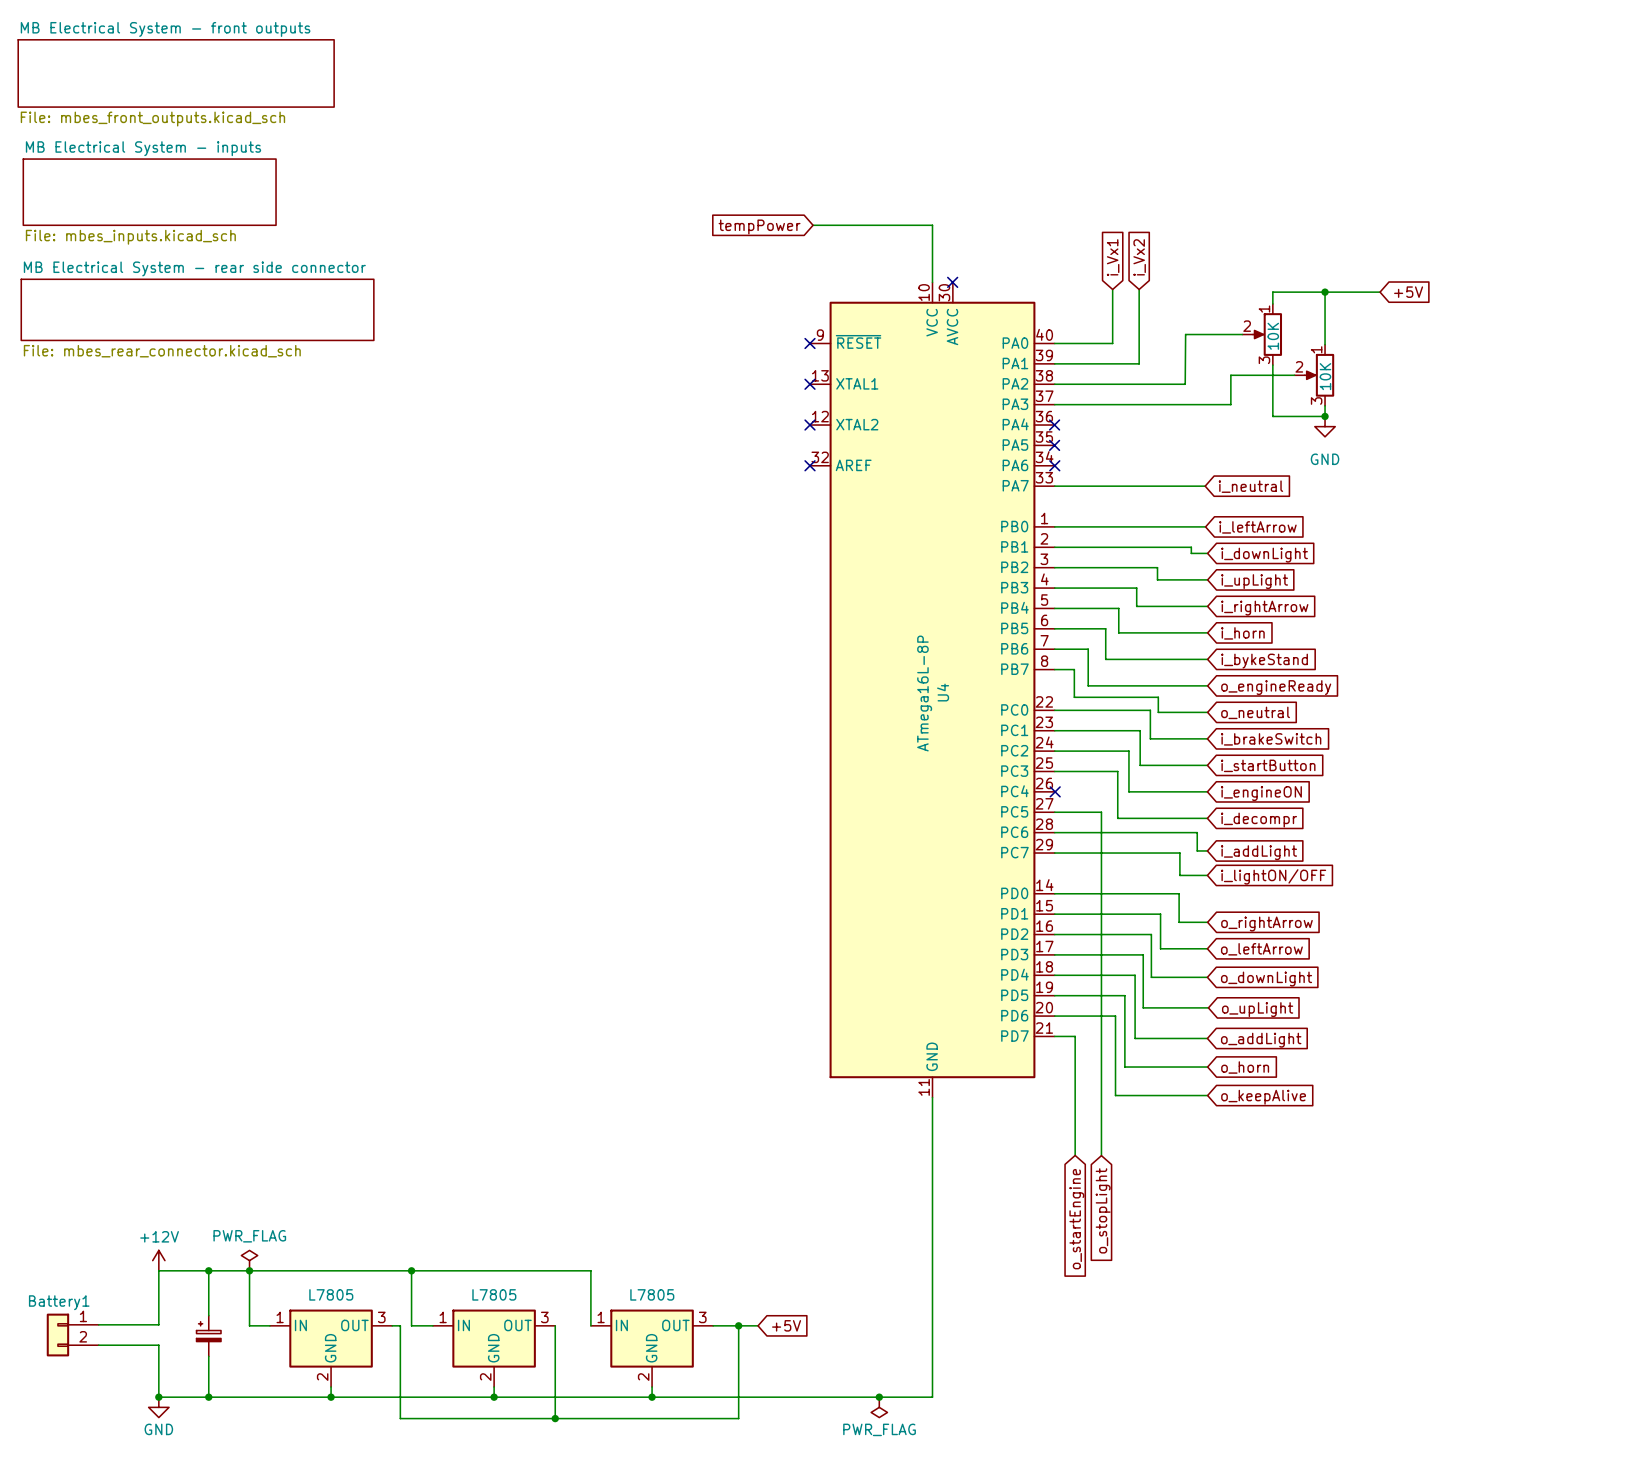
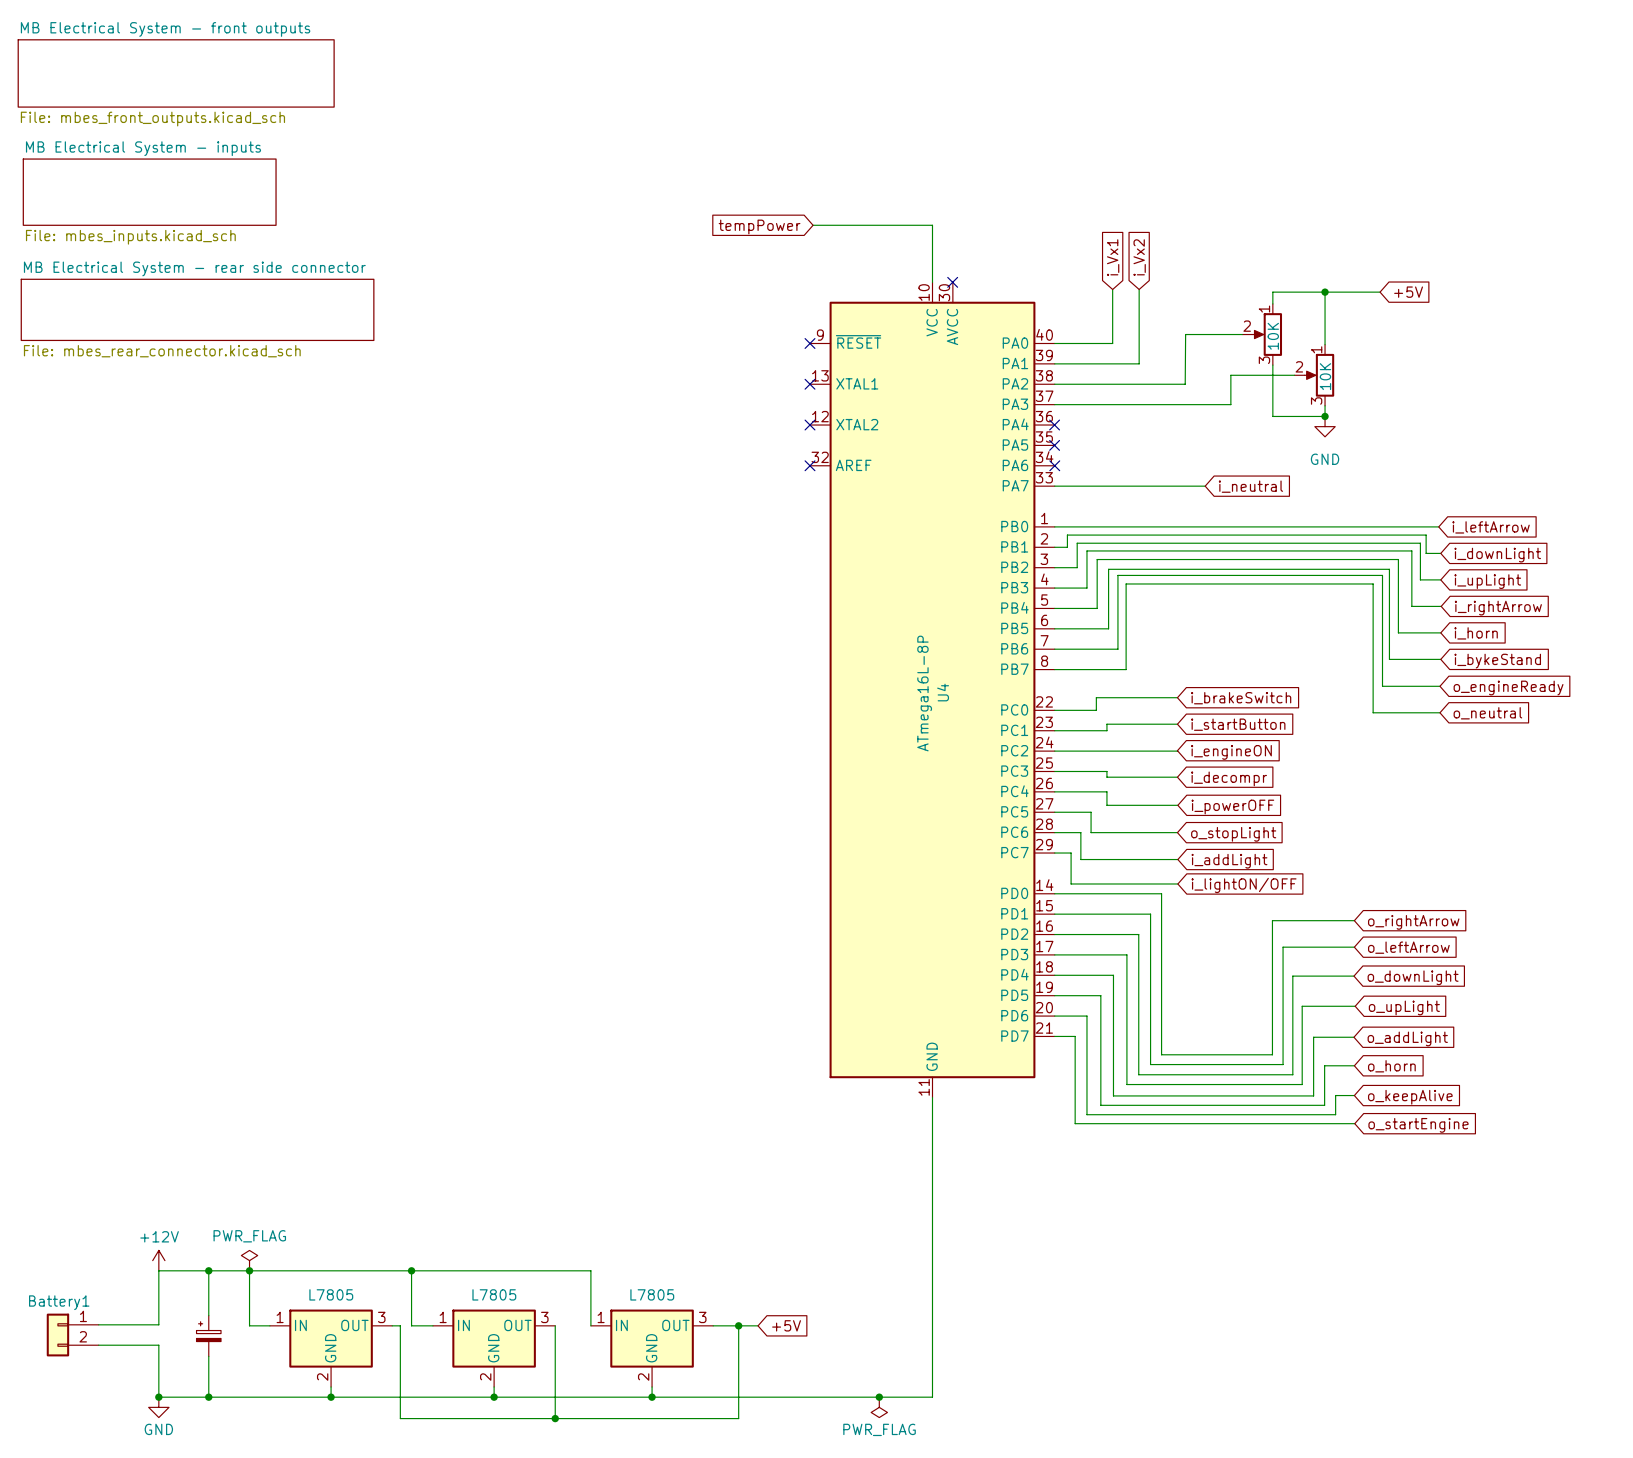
wire: none -> (1205, 526) (1438, 526)
global label: i_leftArrow (1257, 527) -> none
global label: none -> i_leftArrow (1491, 527)
wire: (1067, 547) (1191, 547) (1191, 553) (1207, 553) -> (1067, 547) (1067, 535) (1426, 535) (1426, 553) (1440, 553)
global label: i_downLight (1264, 555) -> none
global label: none -> i_downLight (1497, 555)
wire: (1077, 567) (1157, 567) (1157, 579) (1207, 579) -> (1077, 567) (1077, 543) (1420, 543) (1420, 579) (1440, 579)
global label: i_upLight (1254, 581) -> none
global label: none -> i_upLight (1487, 581)
wire: (1086, 588) (1136, 588) (1136, 606) (1207, 606) -> (1086, 588) (1086, 550) (1411, 550) (1411, 606) (1441, 606)
wire: (1097, 608) (1118, 608) (1118, 632) (1207, 632) -> (1097, 608) (1097, 559) (1398, 559) (1398, 632) (1440, 632)
global label: i_rightArrow (1264, 608) -> none
global label: none -> i_rightArrow (1498, 608)
wire: (1105, 628) (1105, 659) (1207, 659) -> (1105, 628) (1108, 628) (1108, 569) (1389, 569) (1389, 659) (1440, 659)
global label: i_horn (1242, 633) -> none
global label: none -> i_horn (1476, 633)
wire: (1088, 649) (1088, 685) (1207, 685) -> (1088, 649) (1117, 649) (1117, 575) (1382, 575) (1382, 686) (1439, 686)
global label: i_bykeStand (1264, 661) -> none
global label: none -> i_bykeStand (1497, 661)
wire: (1074, 669) (1074, 697) (1158, 697) (1158, 712) (1207, 712) -> (1074, 669) (1126, 669) (1126, 583) (1373, 583) (1373, 712) (1439, 712)
global label: o_engineReady (1276, 687) -> none
global label: none -> o_engineReady (1508, 687)
wire: (1096, 710) (1150, 710) (1150, 738) (1207, 738) -> (1096, 710) (1096, 697) (1177, 697)
global label: o_neutral (1255, 712) -> none
global label: none -> o_neutral (1487, 713)
wire: (1106, 730) (1140, 730) (1140, 765) (1207, 765) -> (1106, 730) (1106, 724) (1177, 724)
global label position: i_brakeSwitch (1271, 739) -> i_brakeSwitch (1241, 698)
wire: (1128, 751) (1128, 791) (1207, 791) -> (1128, 751) (1177, 750)
global label position: i_startButton (1268, 765) -> i_startButton (1238, 724)
wire: (1106, 771) (1117, 771) (1117, 818) (1207, 818) -> (1106, 771) (1106, 777) (1177, 777)
wire: none -> (1054, 791) (1106, 791) (1106, 805) (1177, 805)
no-connect mark: (1055, 791) -> none
global label position: i_engineON (1261, 793) -> i_engineON (1231, 752)
global label: none -> i_powerOFF (1232, 807)
wire: (1091, 812) (1101, 812) (1101, 1155) -> none
global label position: i_decompr (1259, 820) -> i_decompr (1229, 778)
wire: (1080, 832) (1091, 832) -> (1091, 812) (1091, 832)
wire: none -> (1080, 832) (1080, 859) (1177, 859)
wire: (1177, 832) (1197, 832) (1197, 850) (1207, 850) -> none
global label: none -> o_stopLight (1233, 834)
global label position: i_addLight (1259, 852) -> i_addLight (1229, 861)
wire: (1071, 853) (1179, 853) (1179, 875) (1207, 875) -> (1071, 853) (1071, 883) (1177, 883)
global label position: i_lightON/OFF (1273, 876) -> i_lightON/OFF (1244, 885)
wire: (1161, 893) (1179, 893) (1179, 922) (1207, 922) -> (1161, 893) (1161, 1054) (1272, 1054) (1272, 920) (1354, 920)
wire: (1150, 914) (1160, 914) (1160, 948) (1207, 948) -> (1150, 914) (1150, 1064) (1283, 1064) (1283, 947) (1354, 947)
global label position: o_rightArrow (1266, 924) -> o_rightArrow (1413, 922)
wire: (1138, 934) (1151, 934) (1151, 977) (1207, 977) -> (1138, 934) (1138, 1074) (1292, 1074) (1292, 976) (1353, 976)
global label position: o_leftArrow (1261, 949) -> o_leftArrow (1408, 947)
wire: (1126, 954) (1143, 954) (1143, 1007) (1208, 1007) -> (1126, 954) (1126, 1084) (1302, 1084) (1302, 1006) (1355, 1006)
wire: (1113, 975) (1135, 975) (1135, 1038) (1207, 1038) -> (1113, 975) (1113, 1095) (1313, 1095) (1313, 1037) (1353, 1037)
global label position: o_downLight (1266, 979) -> o_downLight (1413, 977)
wire: (1100, 995) (1124, 995) (1124, 1067) (1207, 1067) -> (1100, 995) (1100, 1105) (1324, 1105) (1324, 1065) (1354, 1065)
global label position: o_upLight (1257, 1009) -> o_upLight (1404, 1007)
wire: (1086, 1016) (1115, 1016) (1115, 1095) (1207, 1095) -> (1086, 1016) (1086, 1114) (1335, 1114) (1335, 1095) (1354, 1095)
global label position: o_addLight (1261, 1040) -> o_addLight (1407, 1038)
global label position: o_horn (1245, 1067) -> o_horn (1391, 1066)
global label position: o_keepAlive (1263, 1097) -> o_keepAlive (1410, 1097)
wire: (1075, 1123) (1075, 1155) -> (1075, 1123) (1354, 1123)
global label: none -> o_startEngine (1418, 1125)
global label: o_stopLight (1103, 1210) -> none
global label: o_startEngine (1076, 1219) -> none

